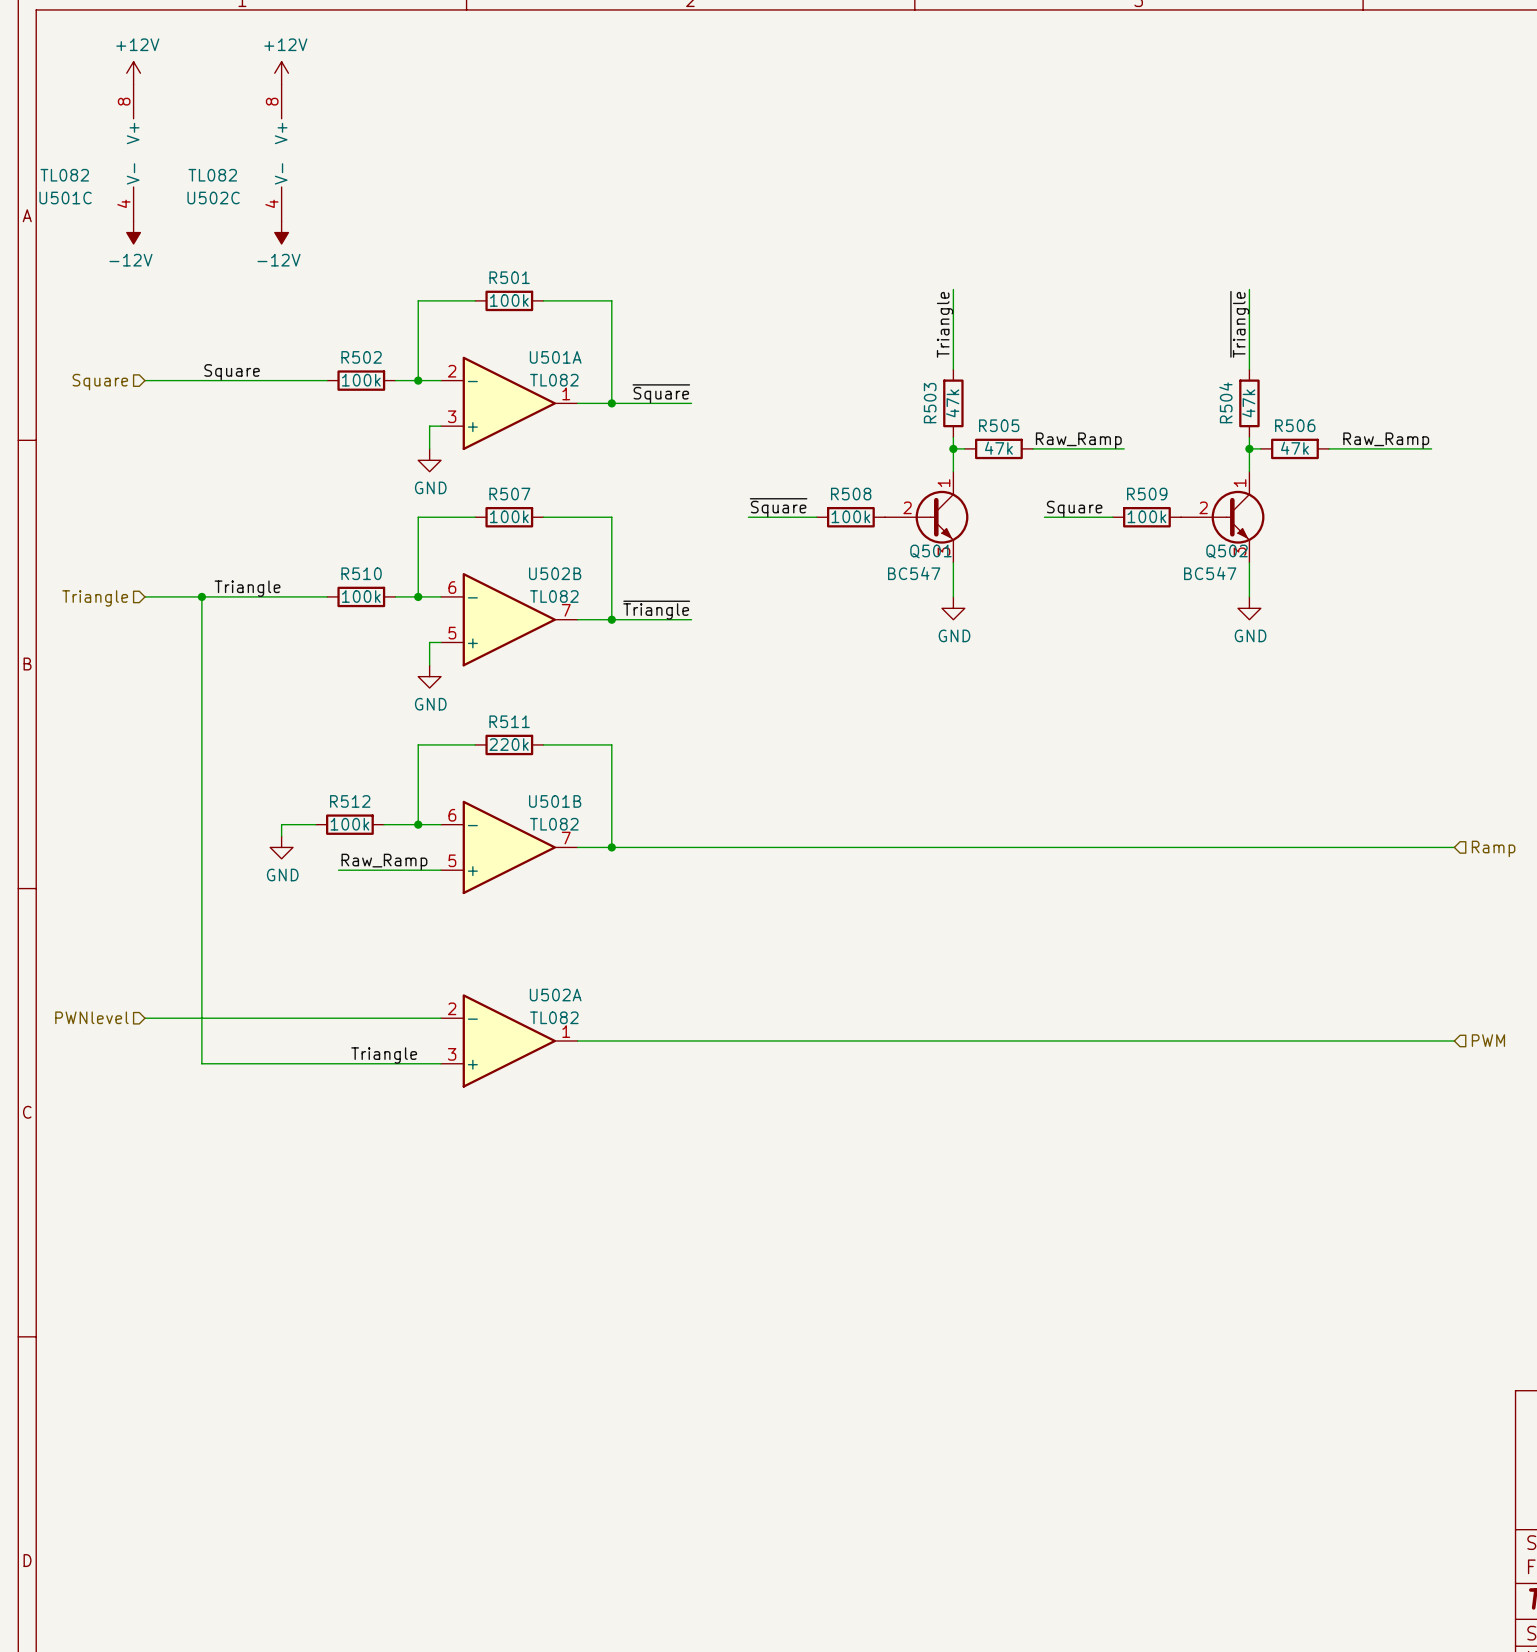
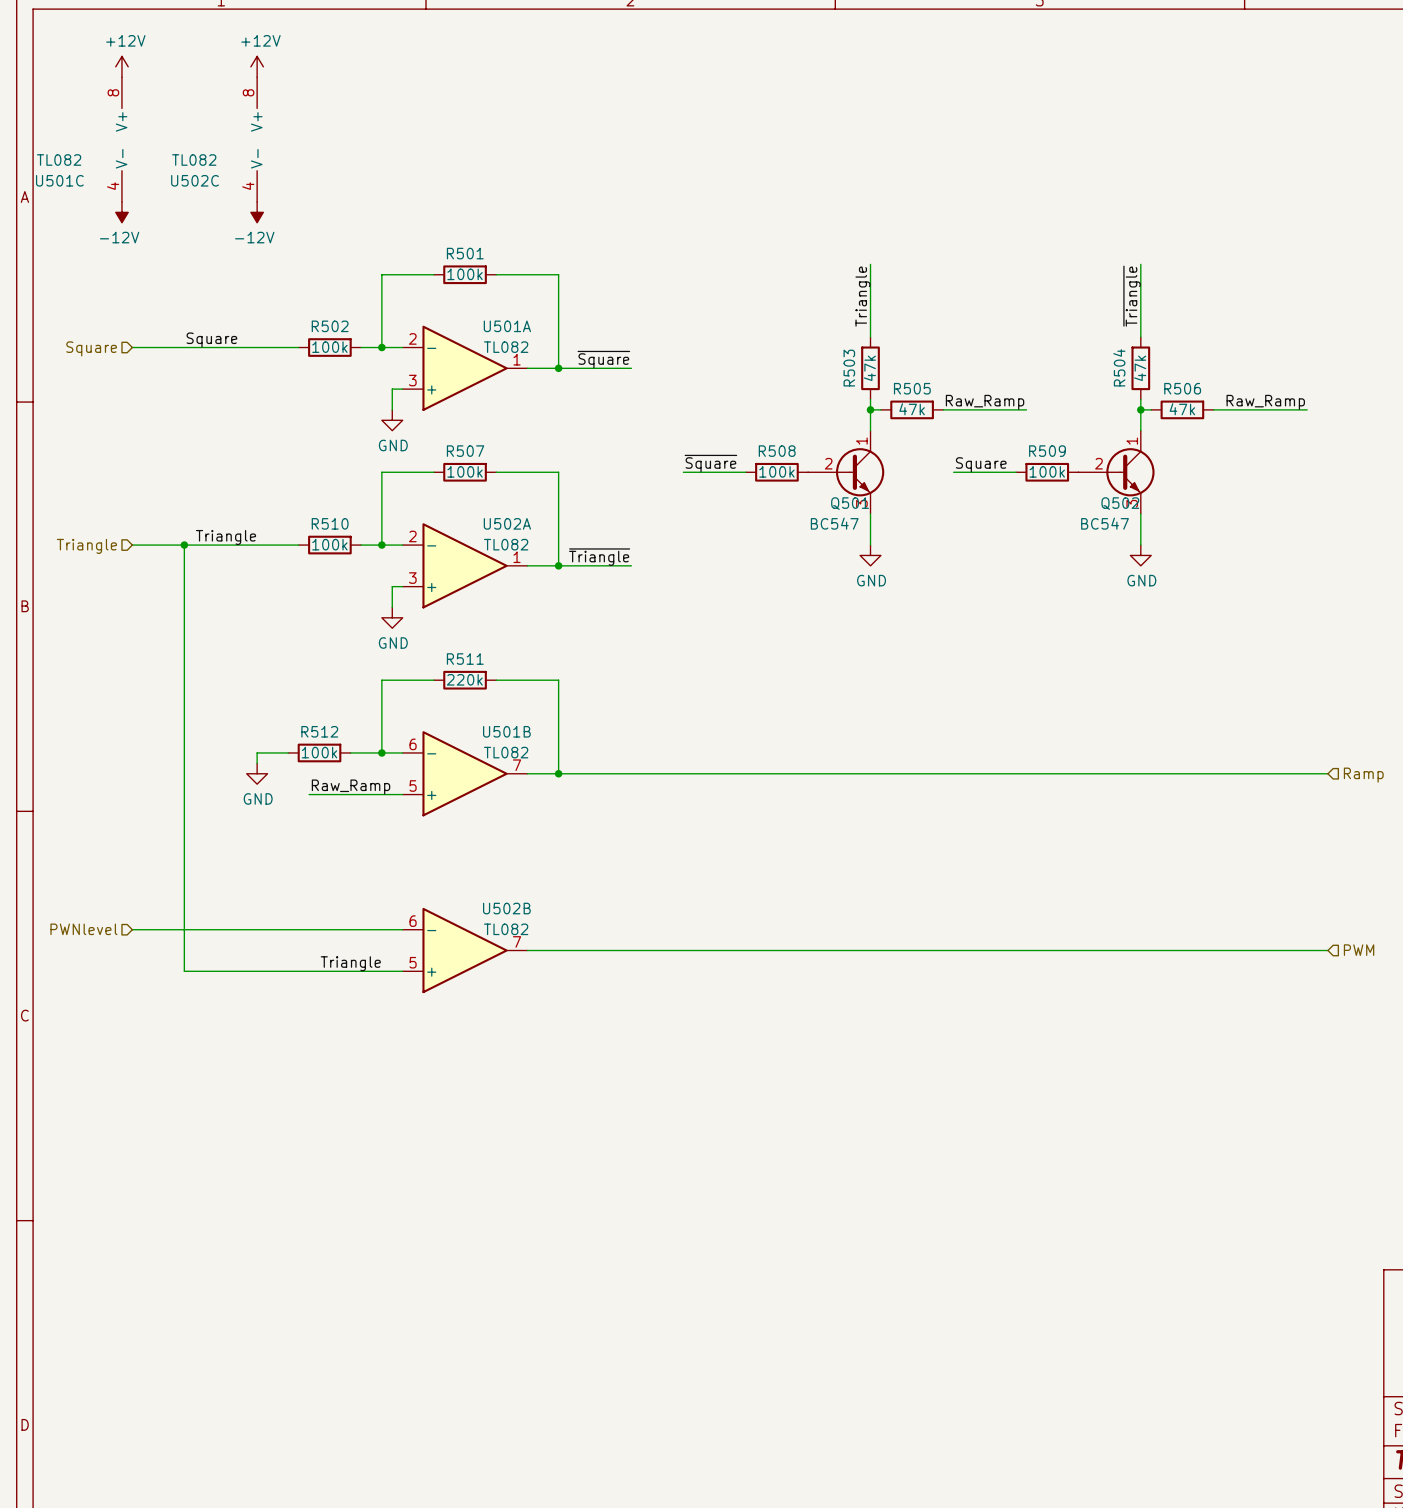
U502B position: (509, 619) -> (465, 950)
U502A position: (509, 1040) -> (465, 565)

